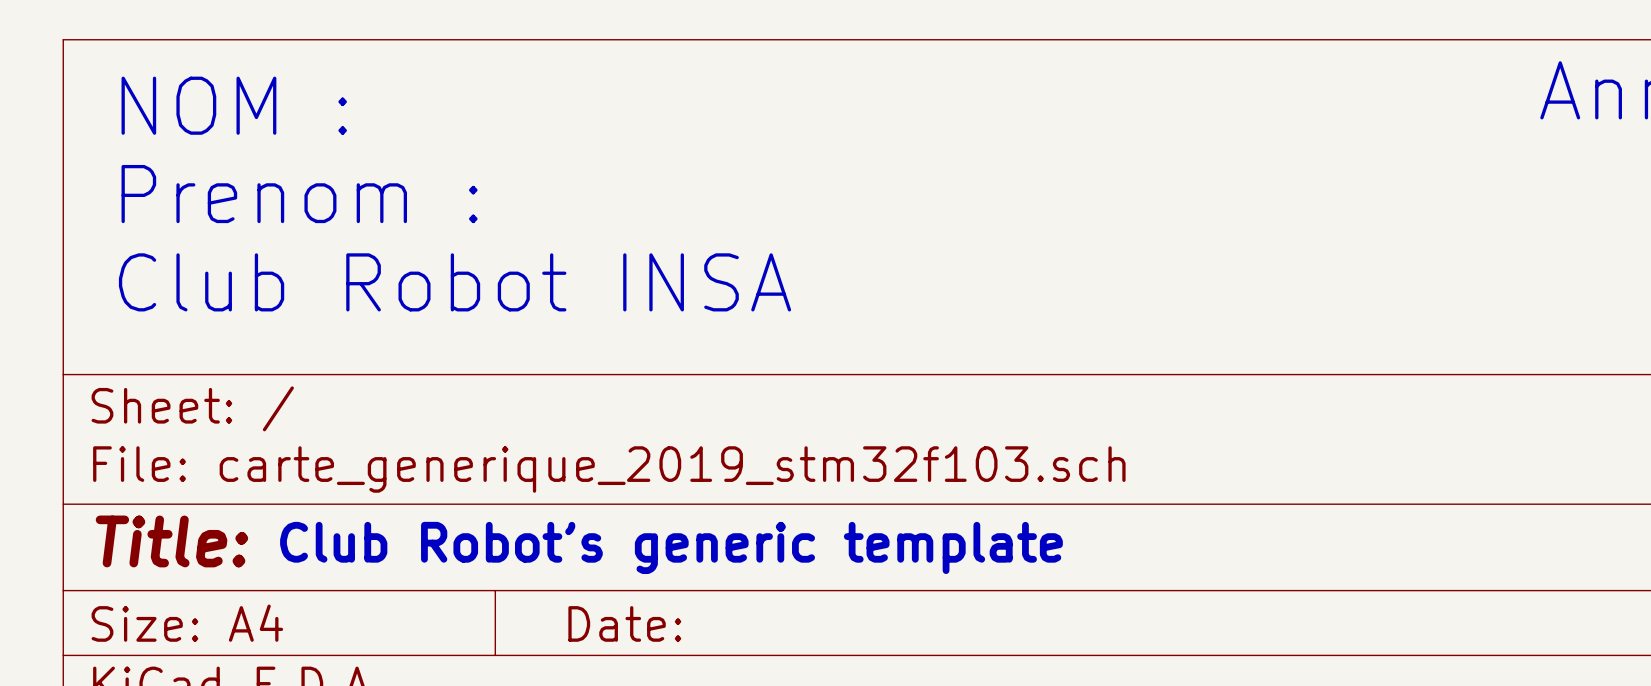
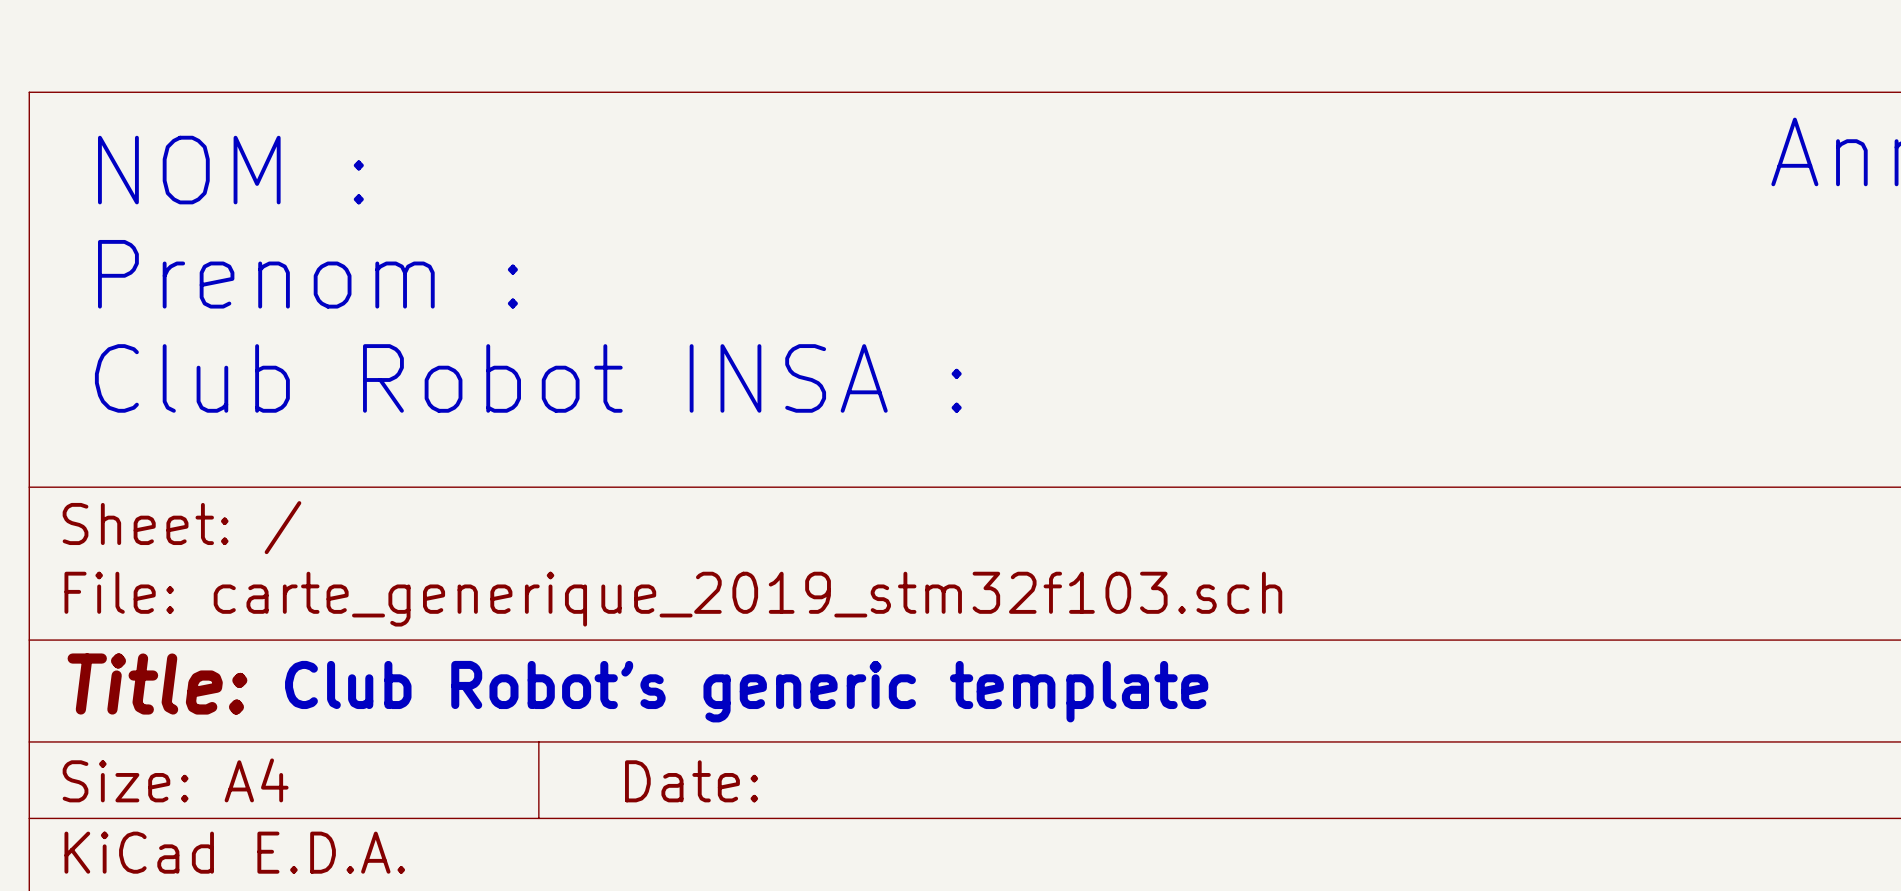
text: Club Robot INSA (455, 282) -> Club Robot INSA : (528, 378)

